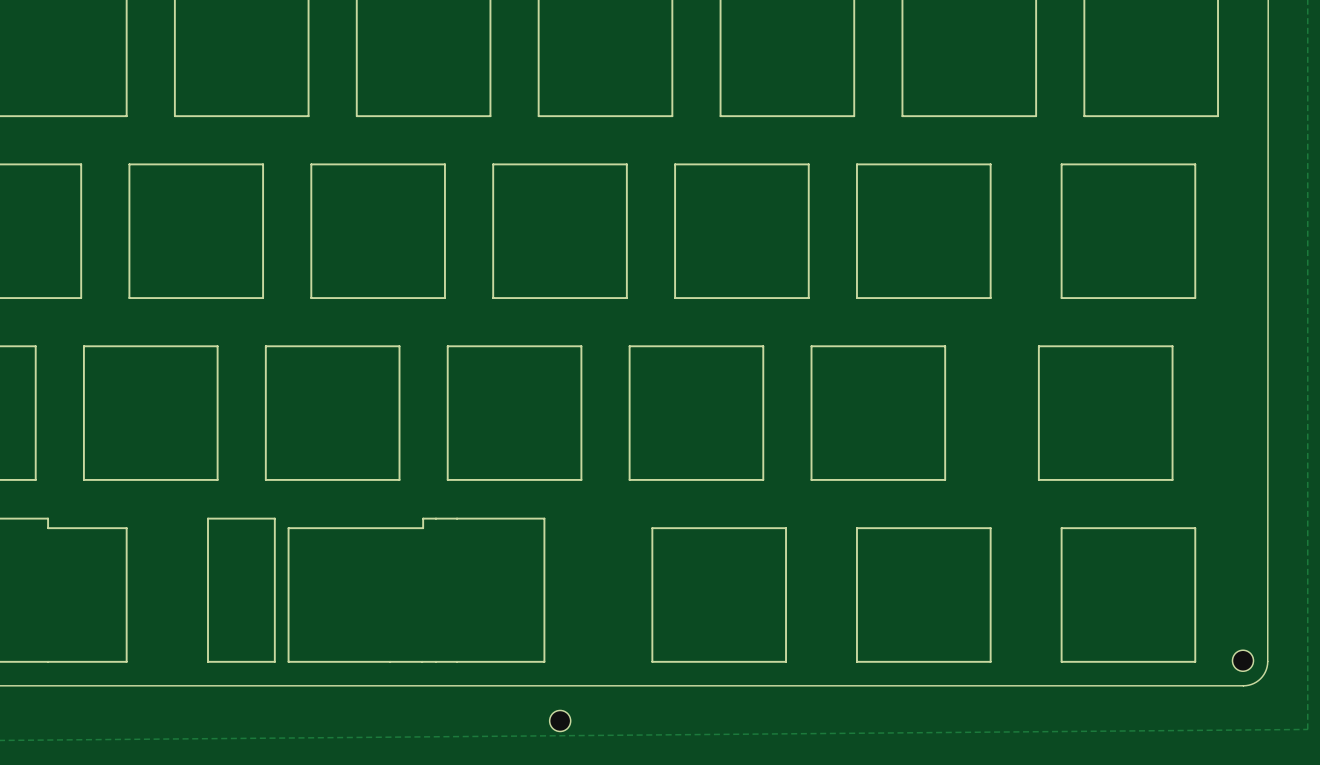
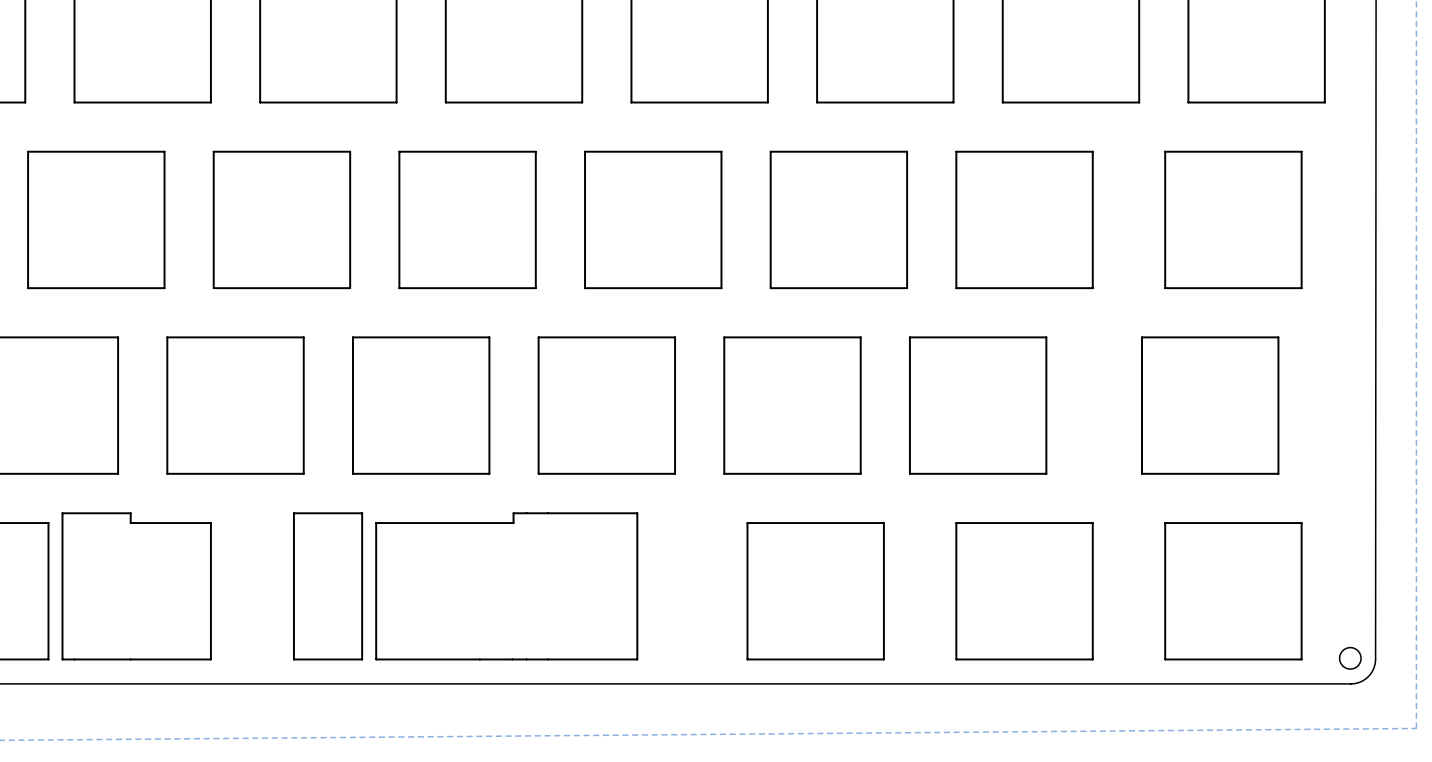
part: (560, 720) -> none

